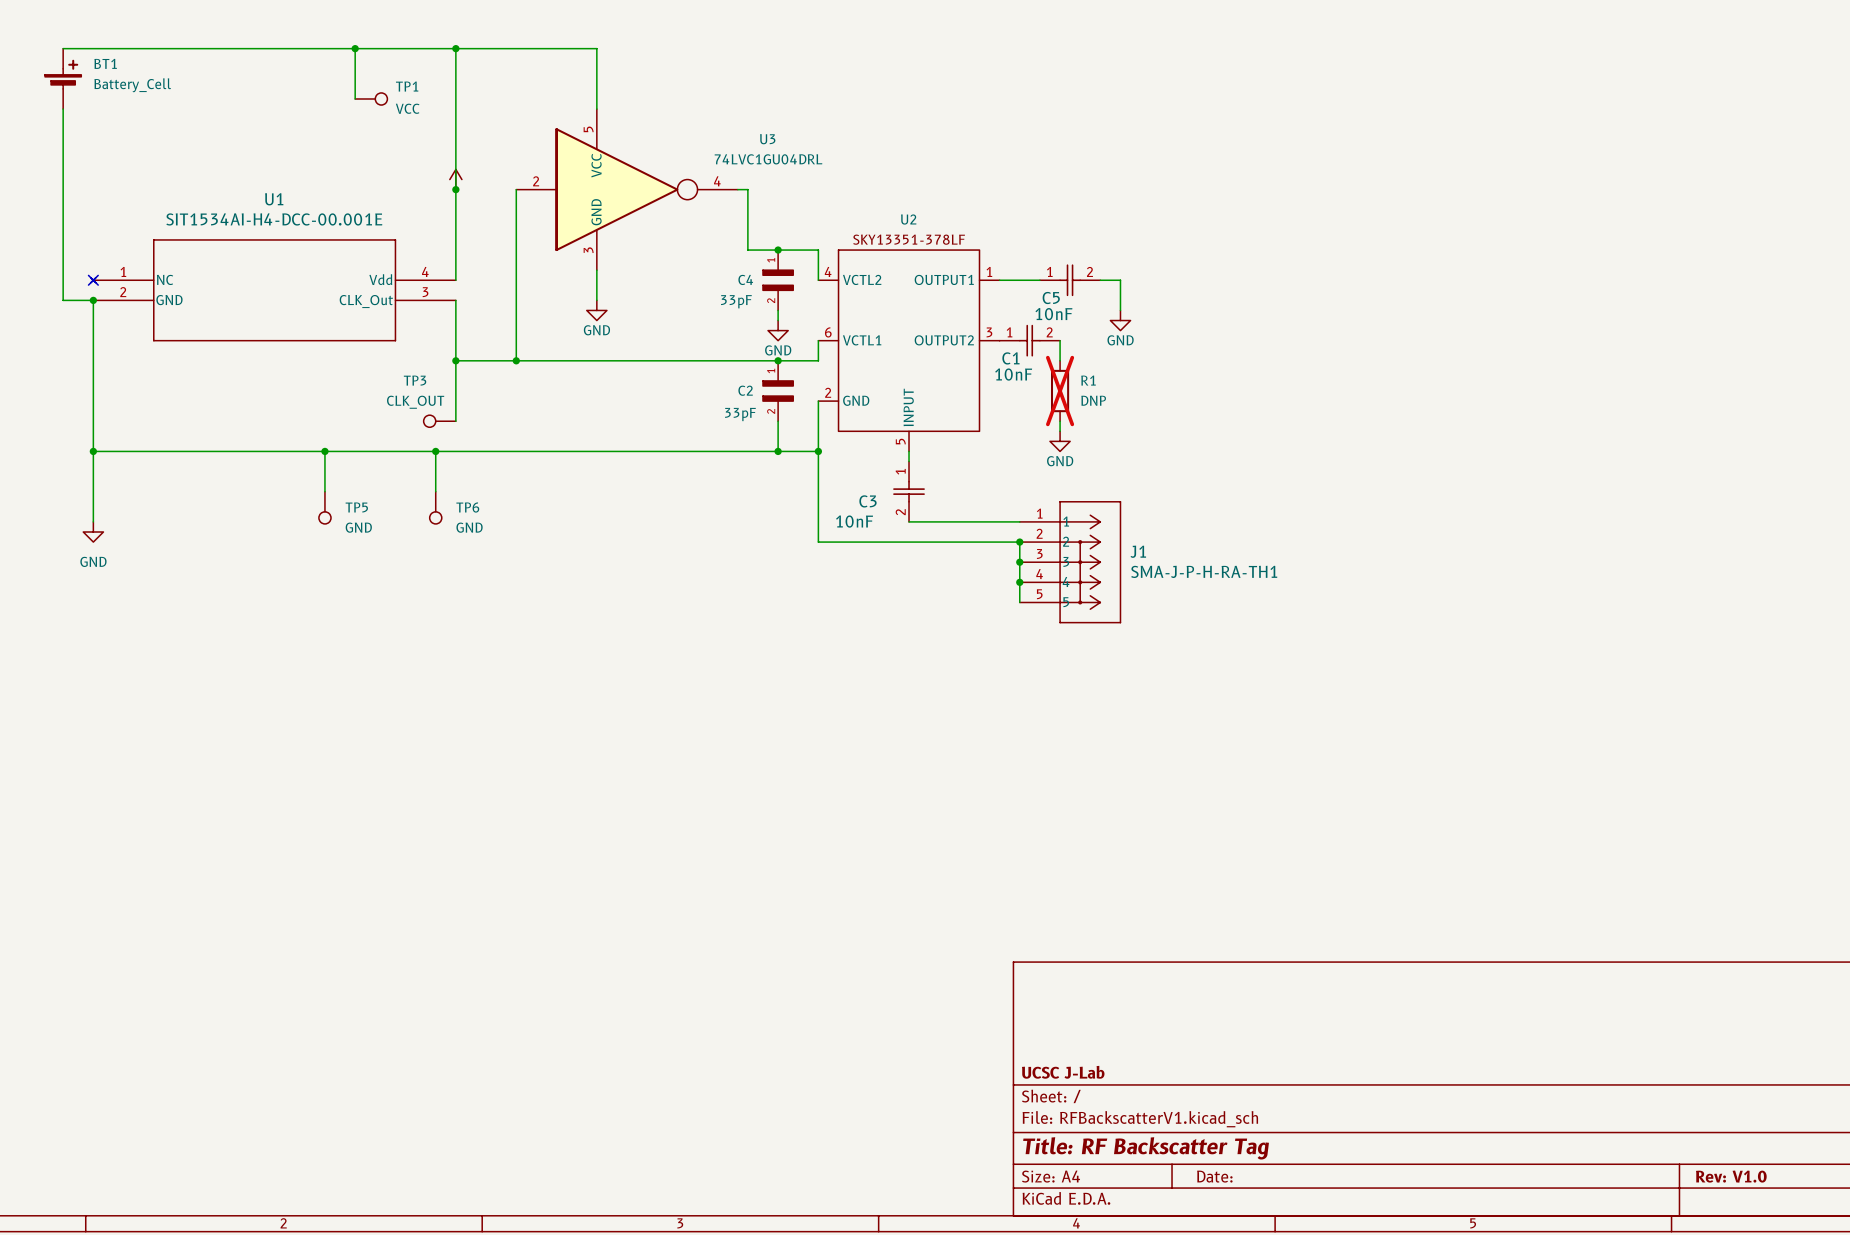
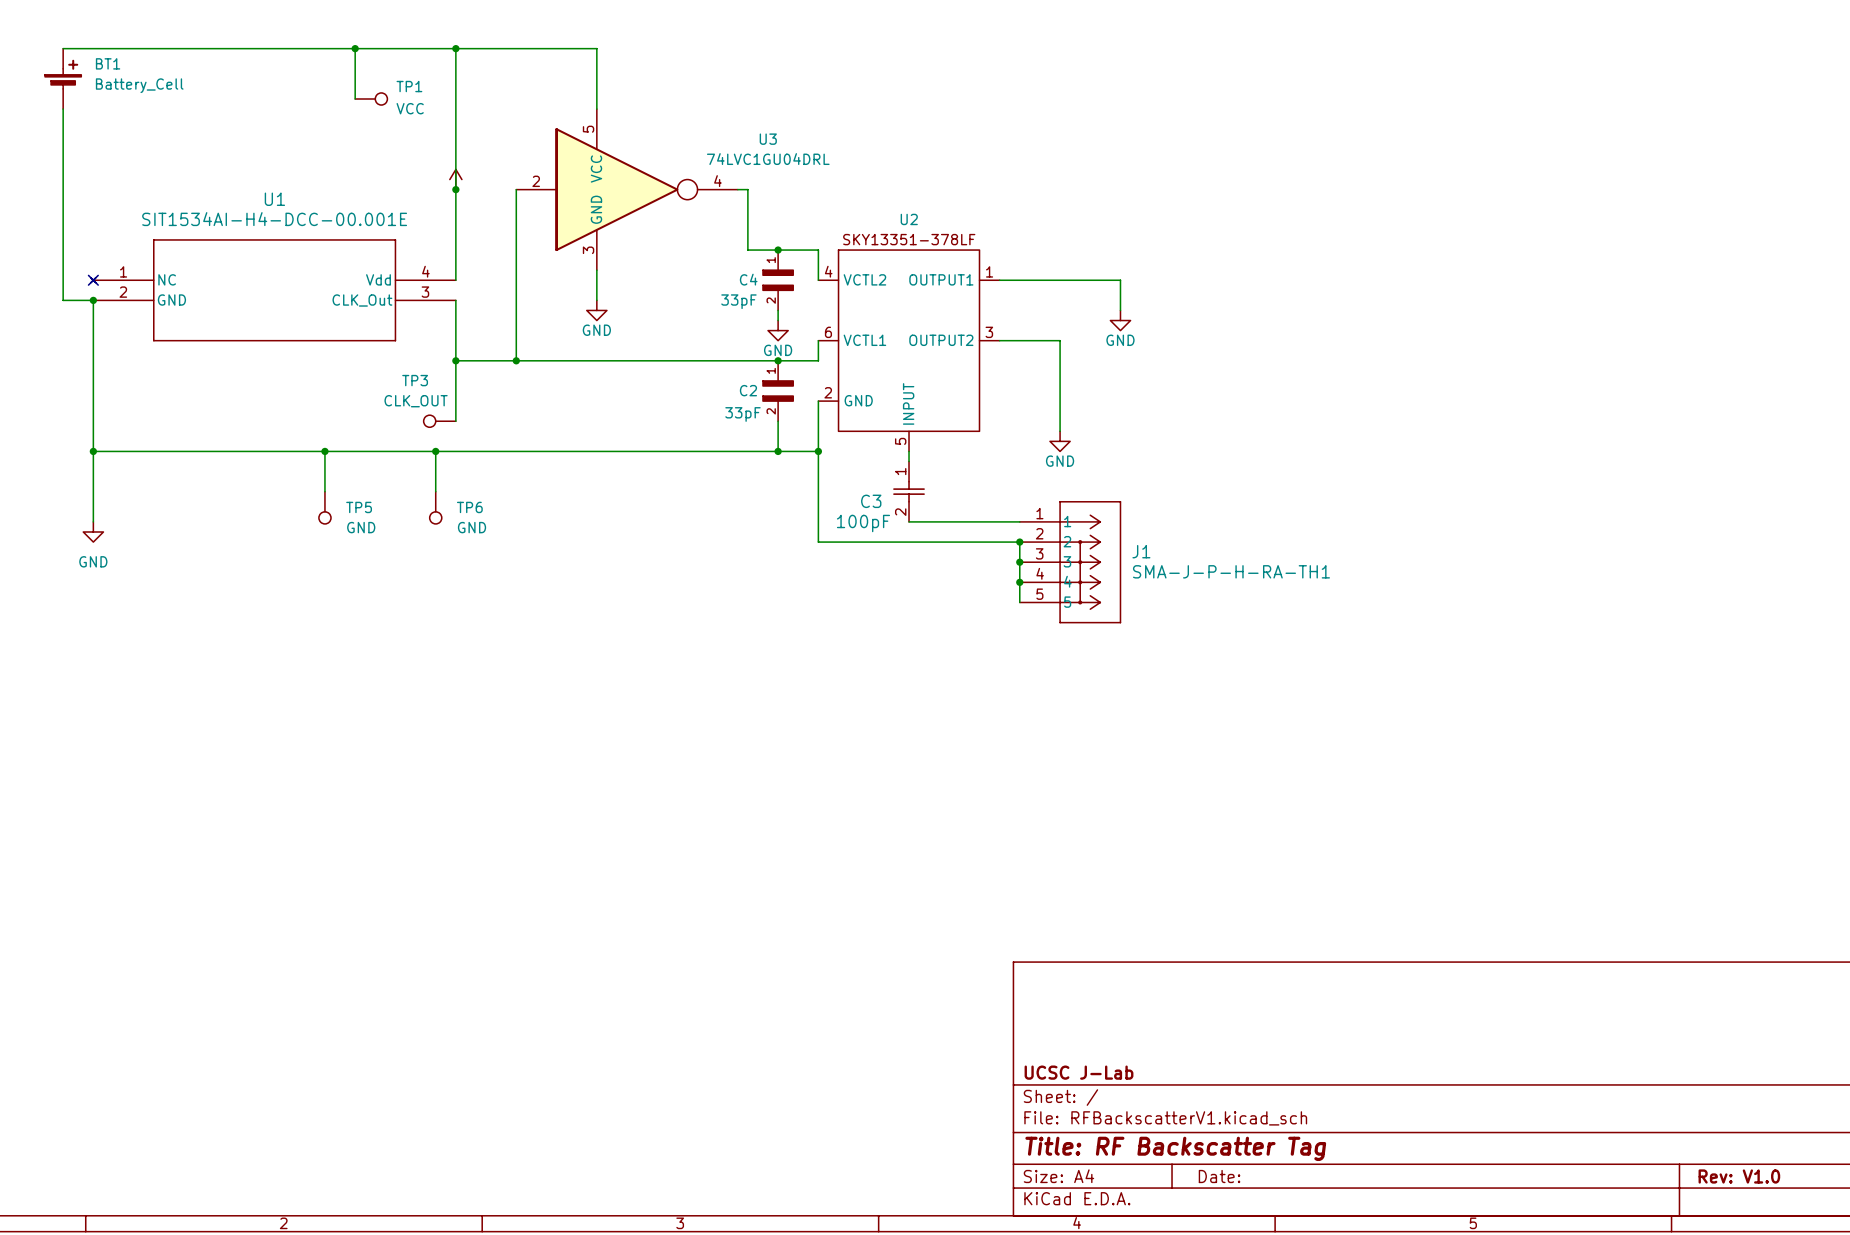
C5: 10nF (1070, 280) -> none
C1: 10nF (1029, 340) -> none
R1: DNP (1060, 391) -> none
C3 value: 10nF (854, 521) -> 100pF (863, 523)

